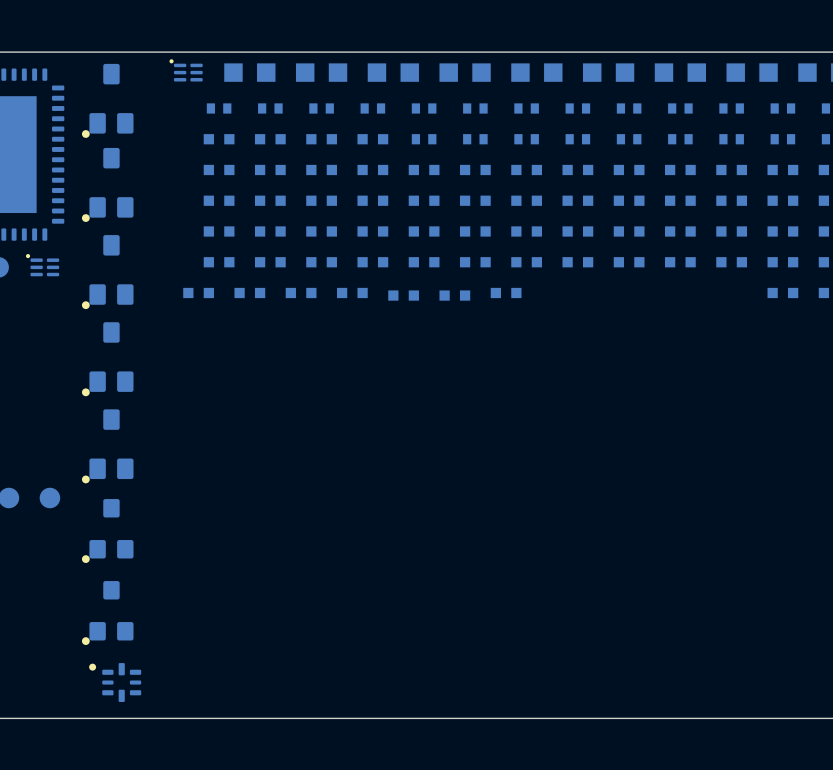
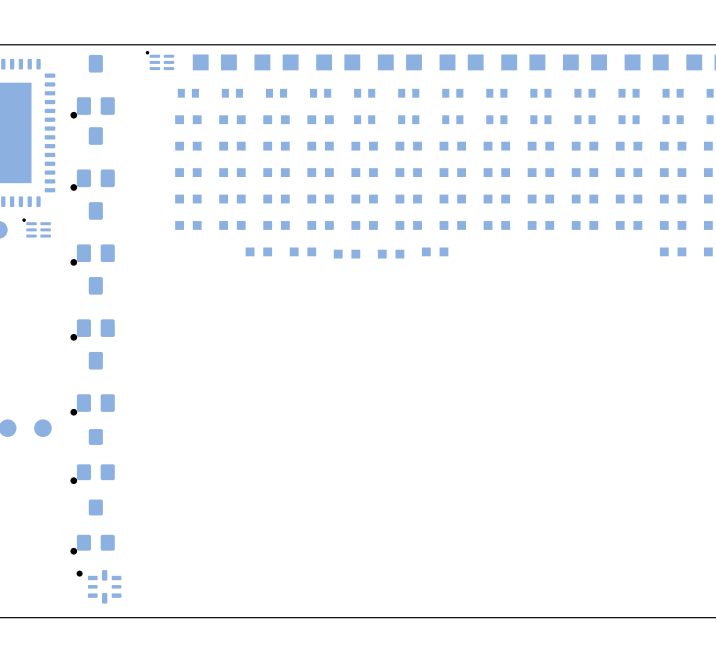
part: (198, 292) -> none
part: (249, 292) -> none

